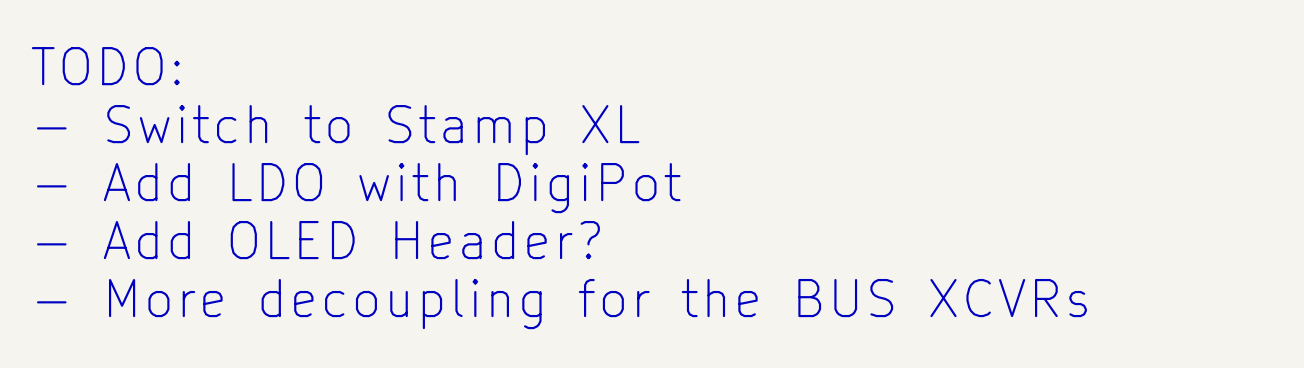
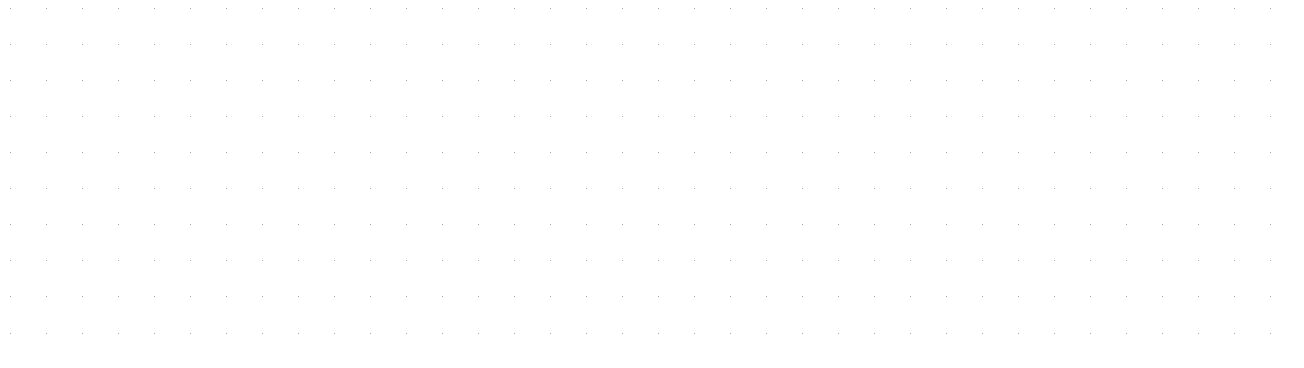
text: TODO: (105, 66) -> none
text: - Switch to Stamp XL (338, 130) -> none
text: - Add LDO with DigiPot (358, 188) -> none
text: - Add OLED Header? (318, 240) -> none
text: - More decoupling for the BUS XCVRs (561, 304) -> none

